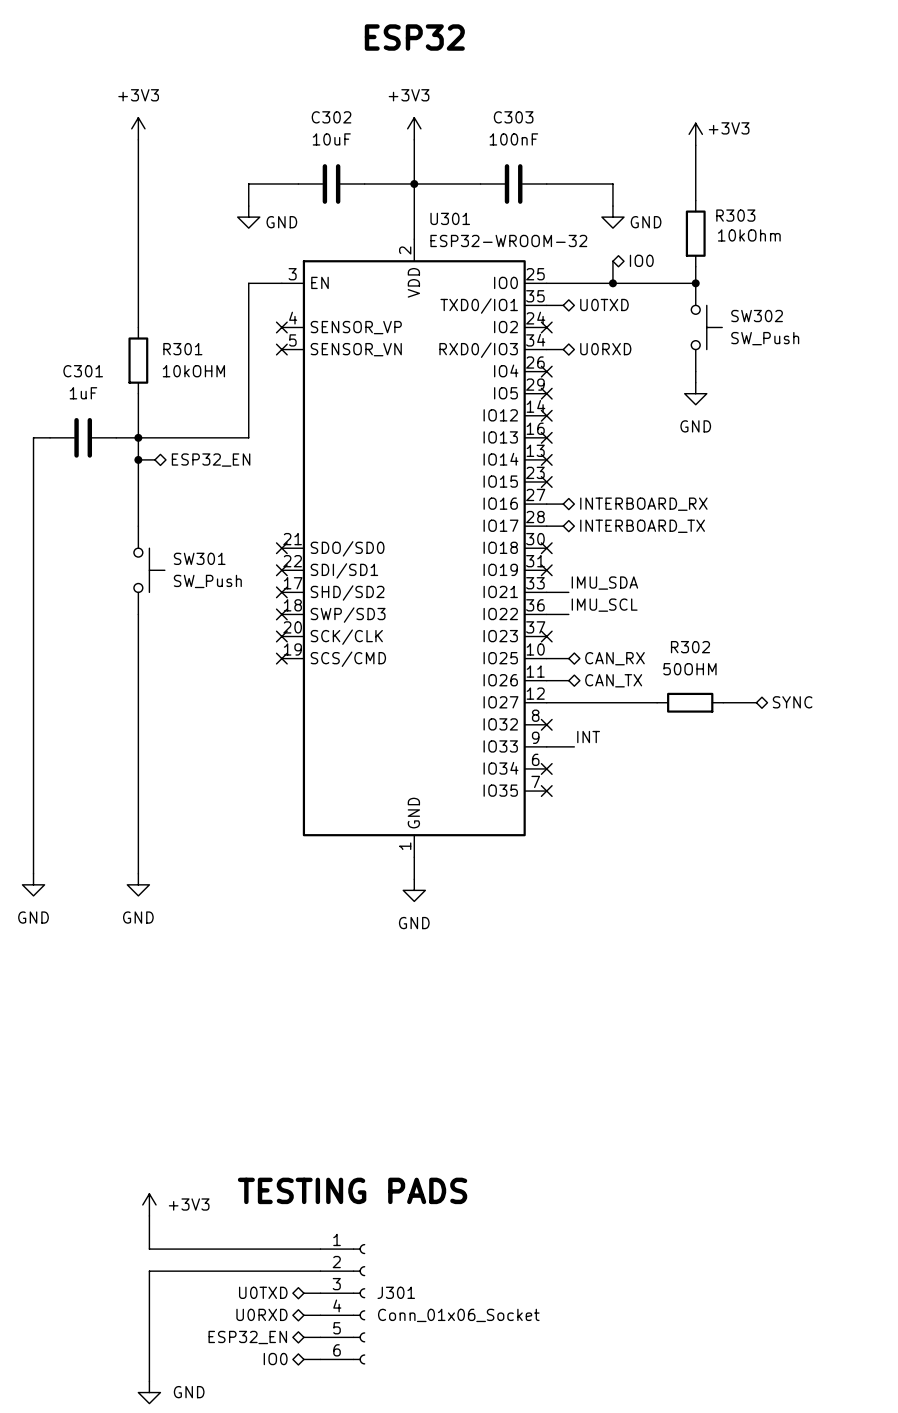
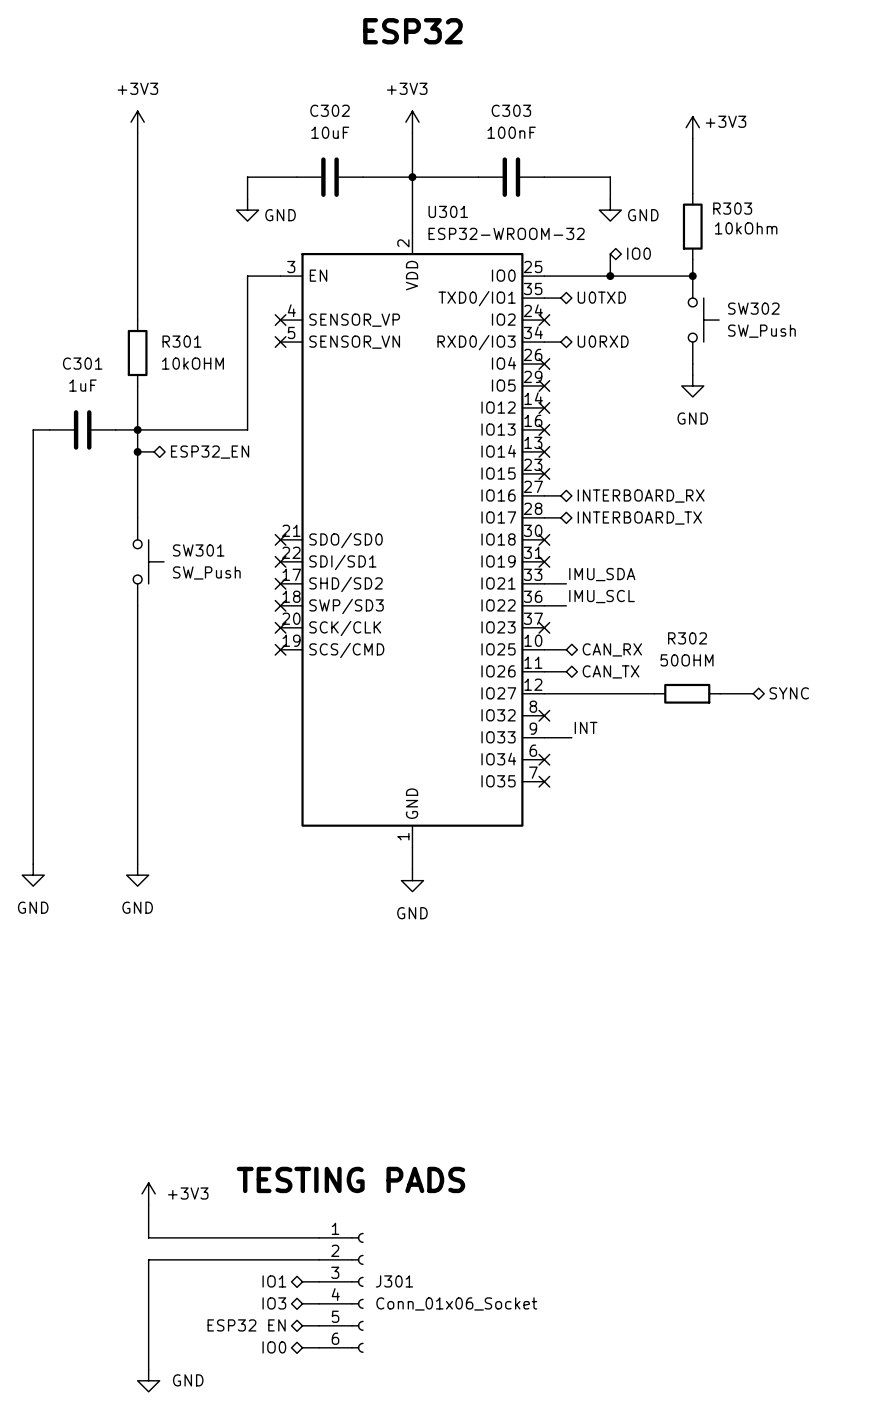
hierarchical label: U0TXD (263, 1292) -> IO1 (274, 1281)
hierarchical label: U0RXD (261, 1314) -> IO3 (274, 1303)
hierarchical label: ESP32_EN (247, 1337) -> ESP32 EN (246, 1325)

